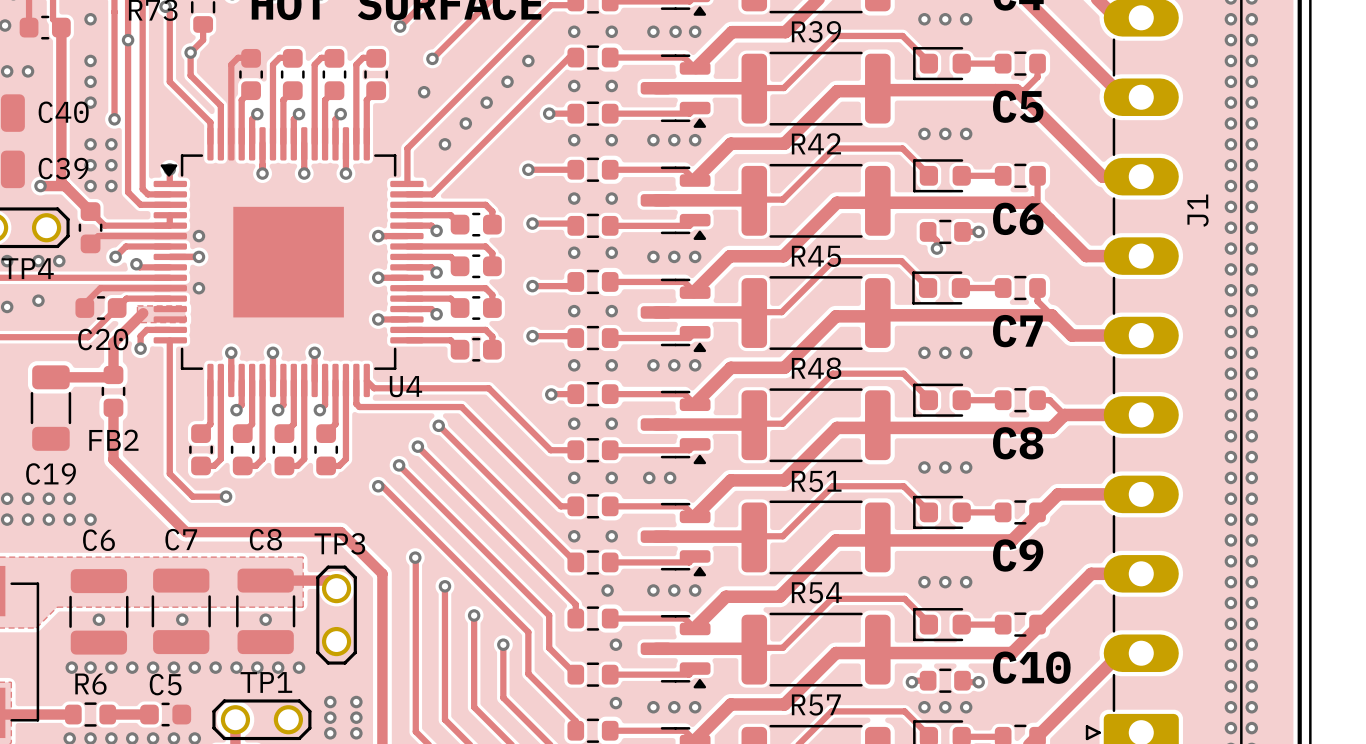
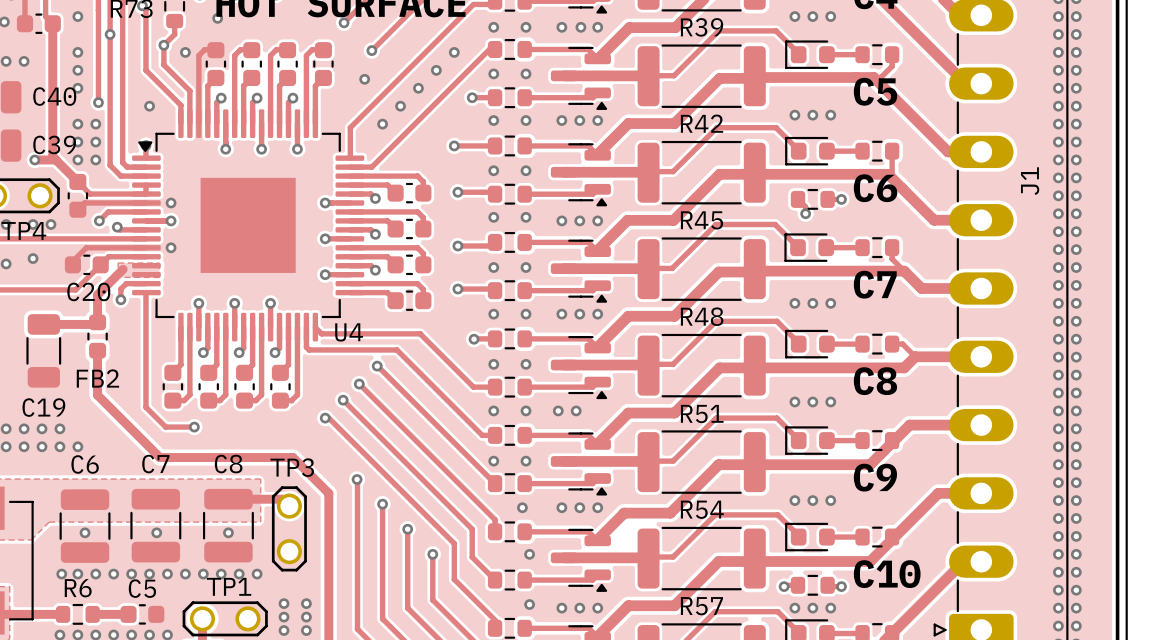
via: none -> (217, 18)
via: none -> (185, 52)
via: none -> (149, 106)

